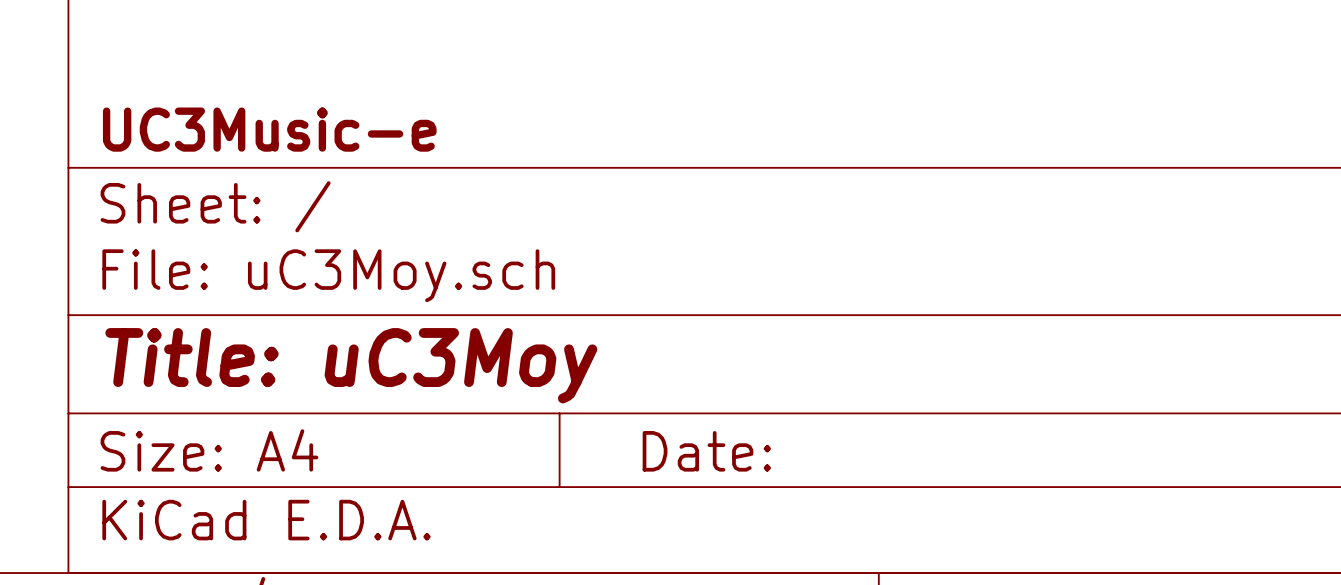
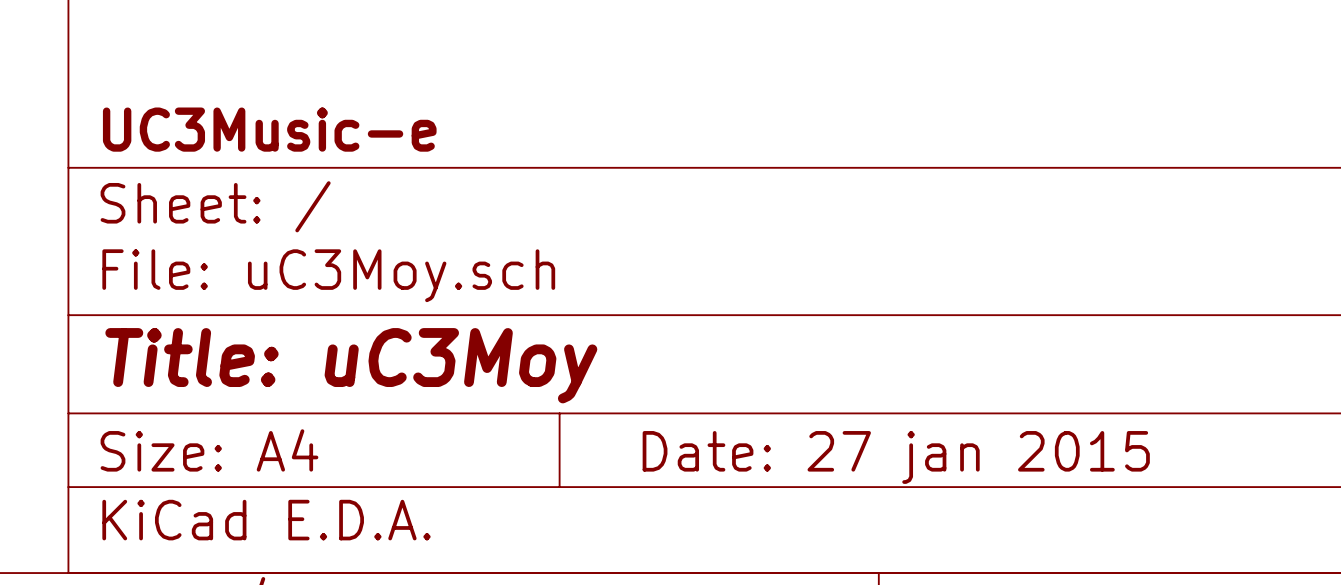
title block: Date: (706, 451) -> Date: 27 jan 2015 (896, 457)

